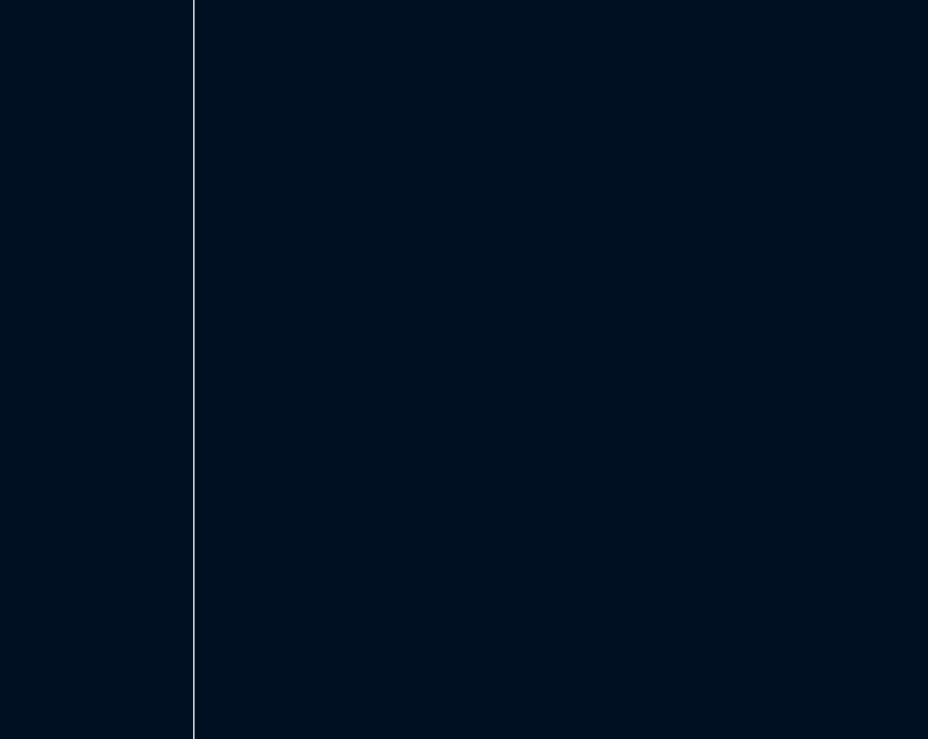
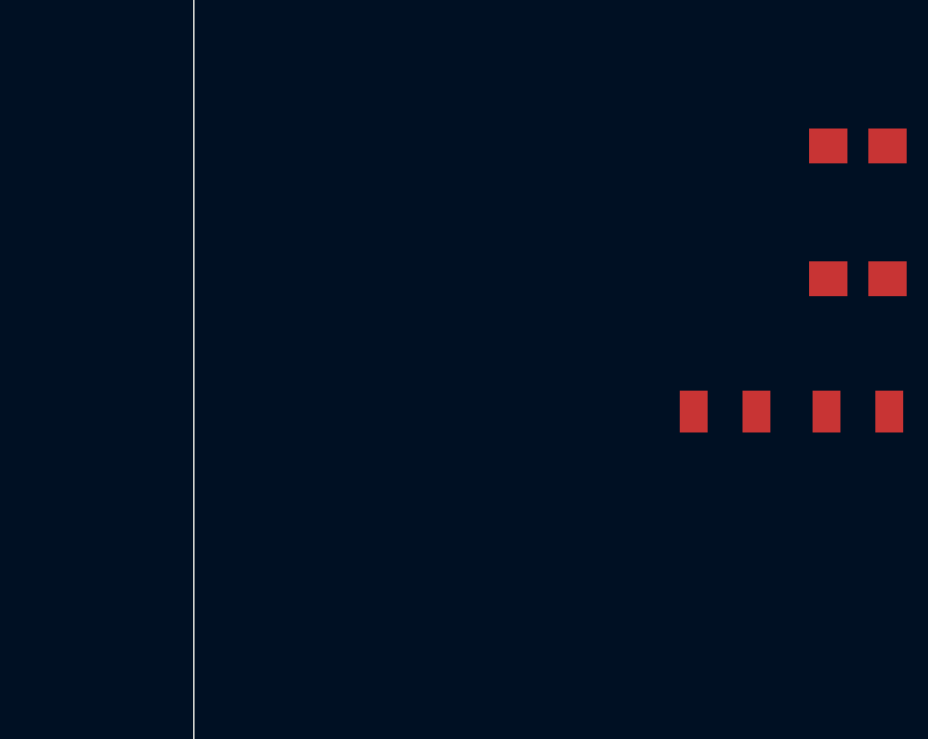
part: none -> (857, 145)
part: none -> (857, 278)
part: none -> (725, 411)
part: none -> (857, 411)

